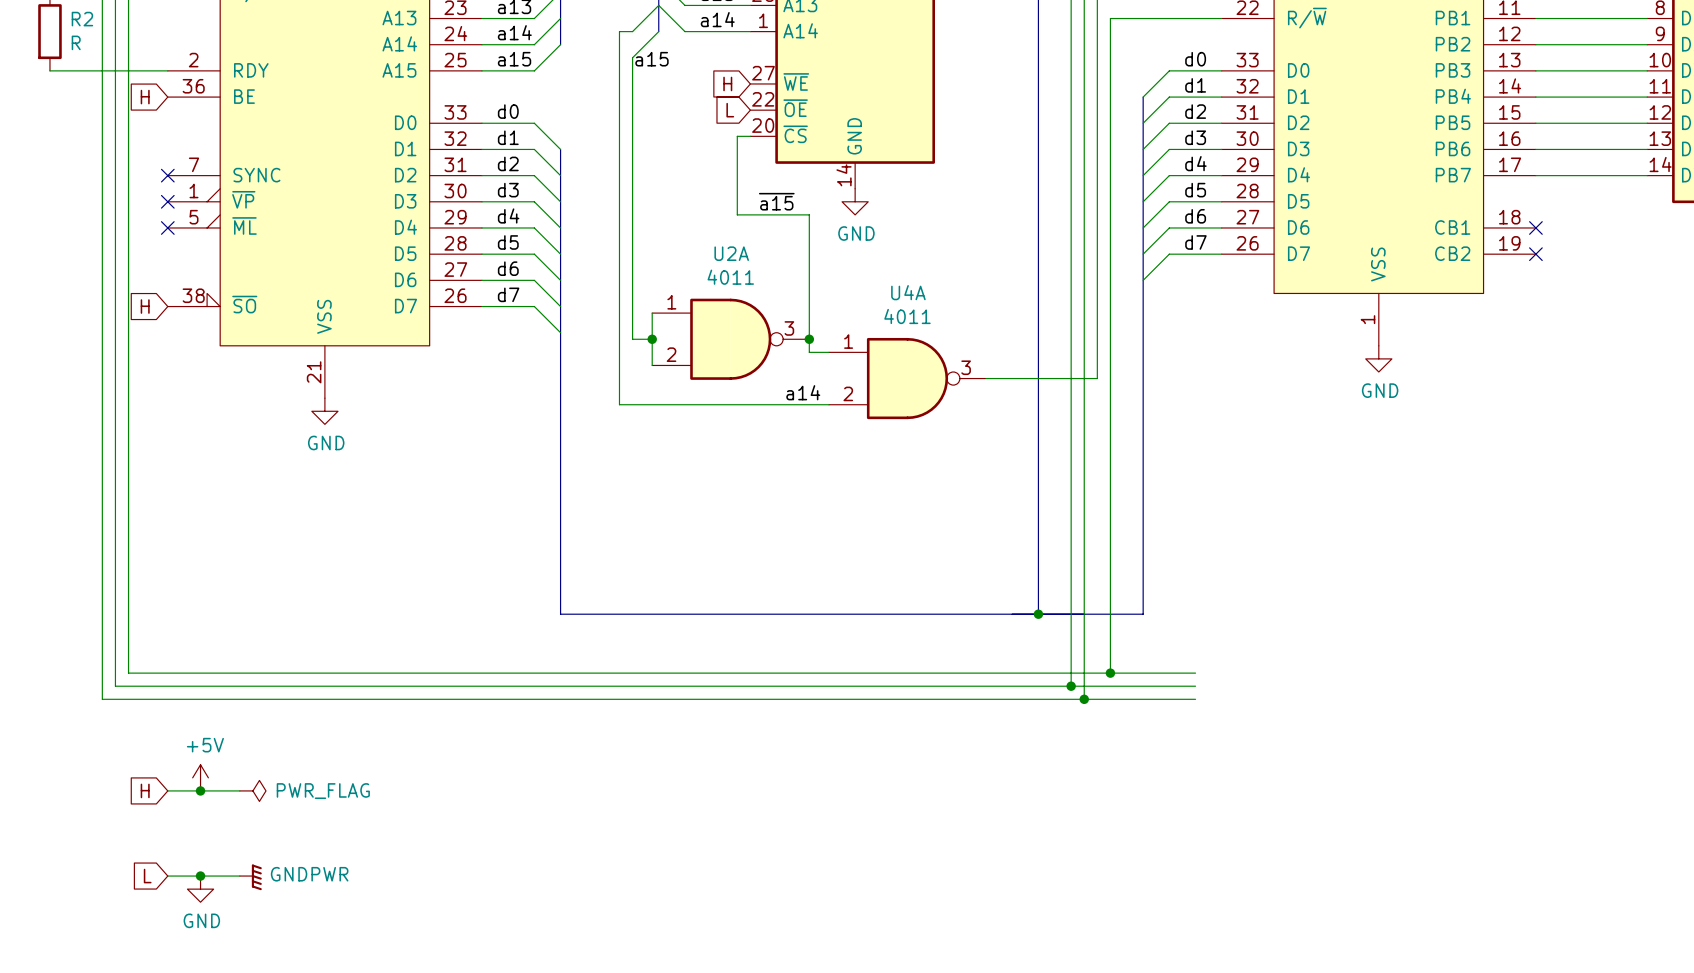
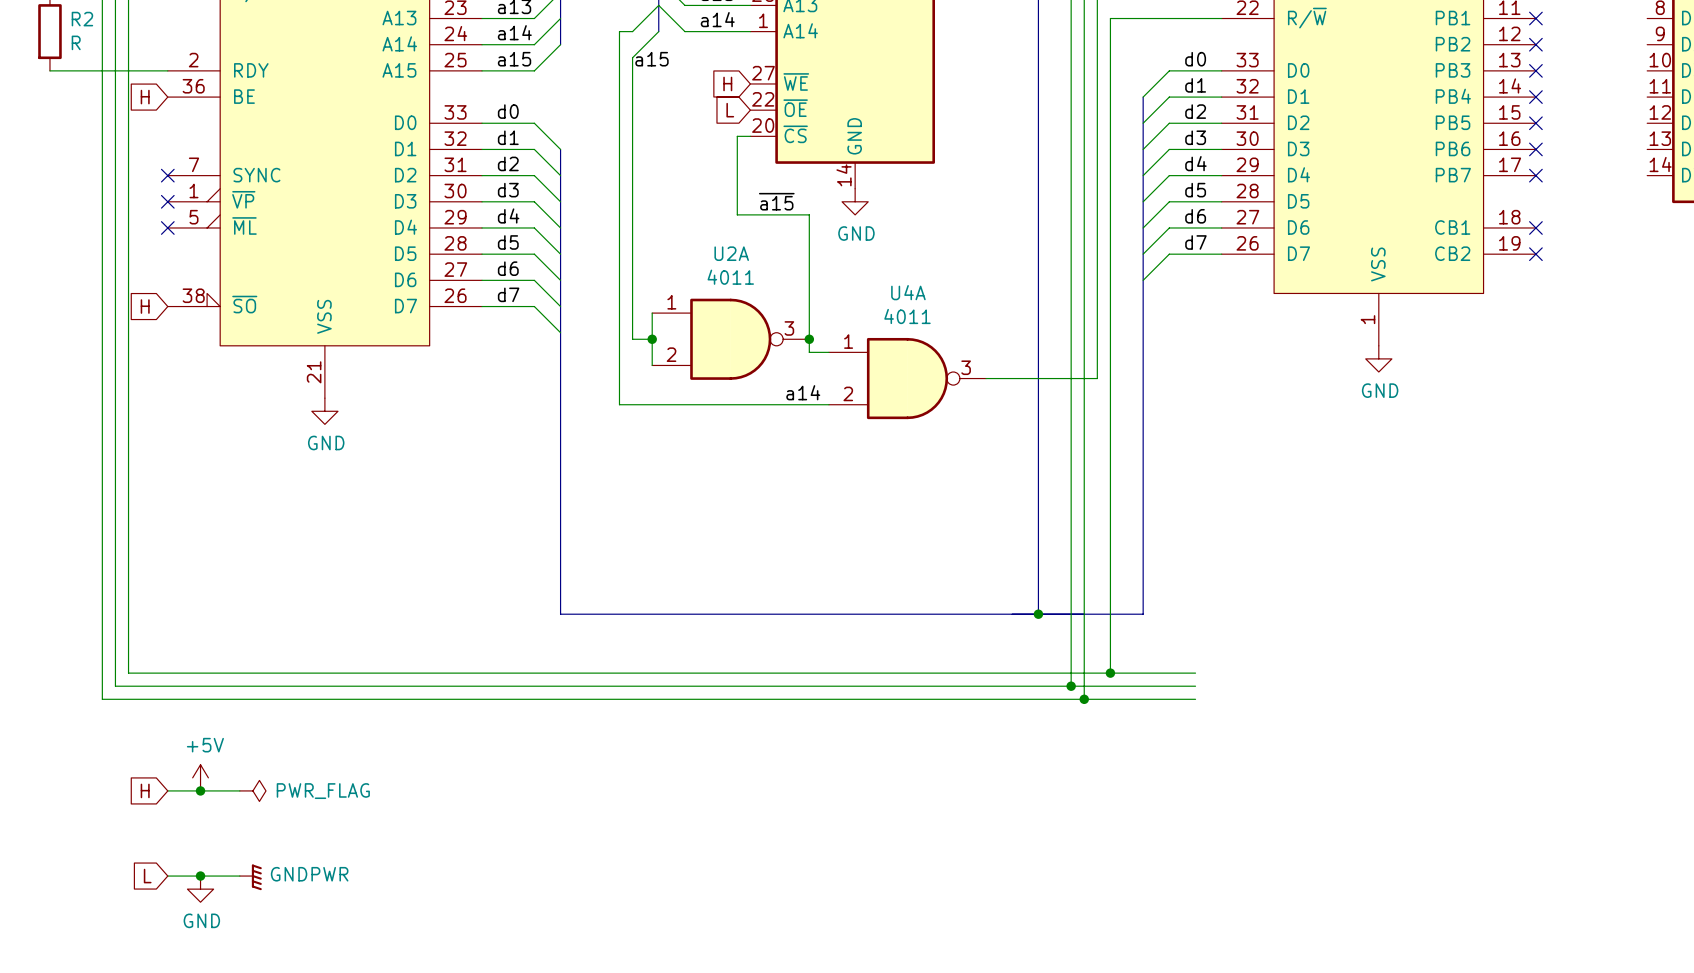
wire: (1535, 18) (1647, 18) -> none
no-connect mark: none -> (1535, 18)
wire: (1535, 44) (1647, 44) -> none
no-connect mark: none -> (1535, 44)
wire: (1535, 70) (1647, 70) -> none
no-connect mark: none -> (1535, 70)
wire: (1535, 97) (1647, 97) -> none
no-connect mark: none -> (1535, 97)
wire: (1535, 123) (1647, 123) -> none
no-connect mark: none -> (1535, 123)
wire: (1535, 149) (1647, 149) -> none
no-connect mark: none -> (1535, 149)
wire: (1535, 175) (1647, 175) -> none
no-connect mark: none -> (1535, 175)

